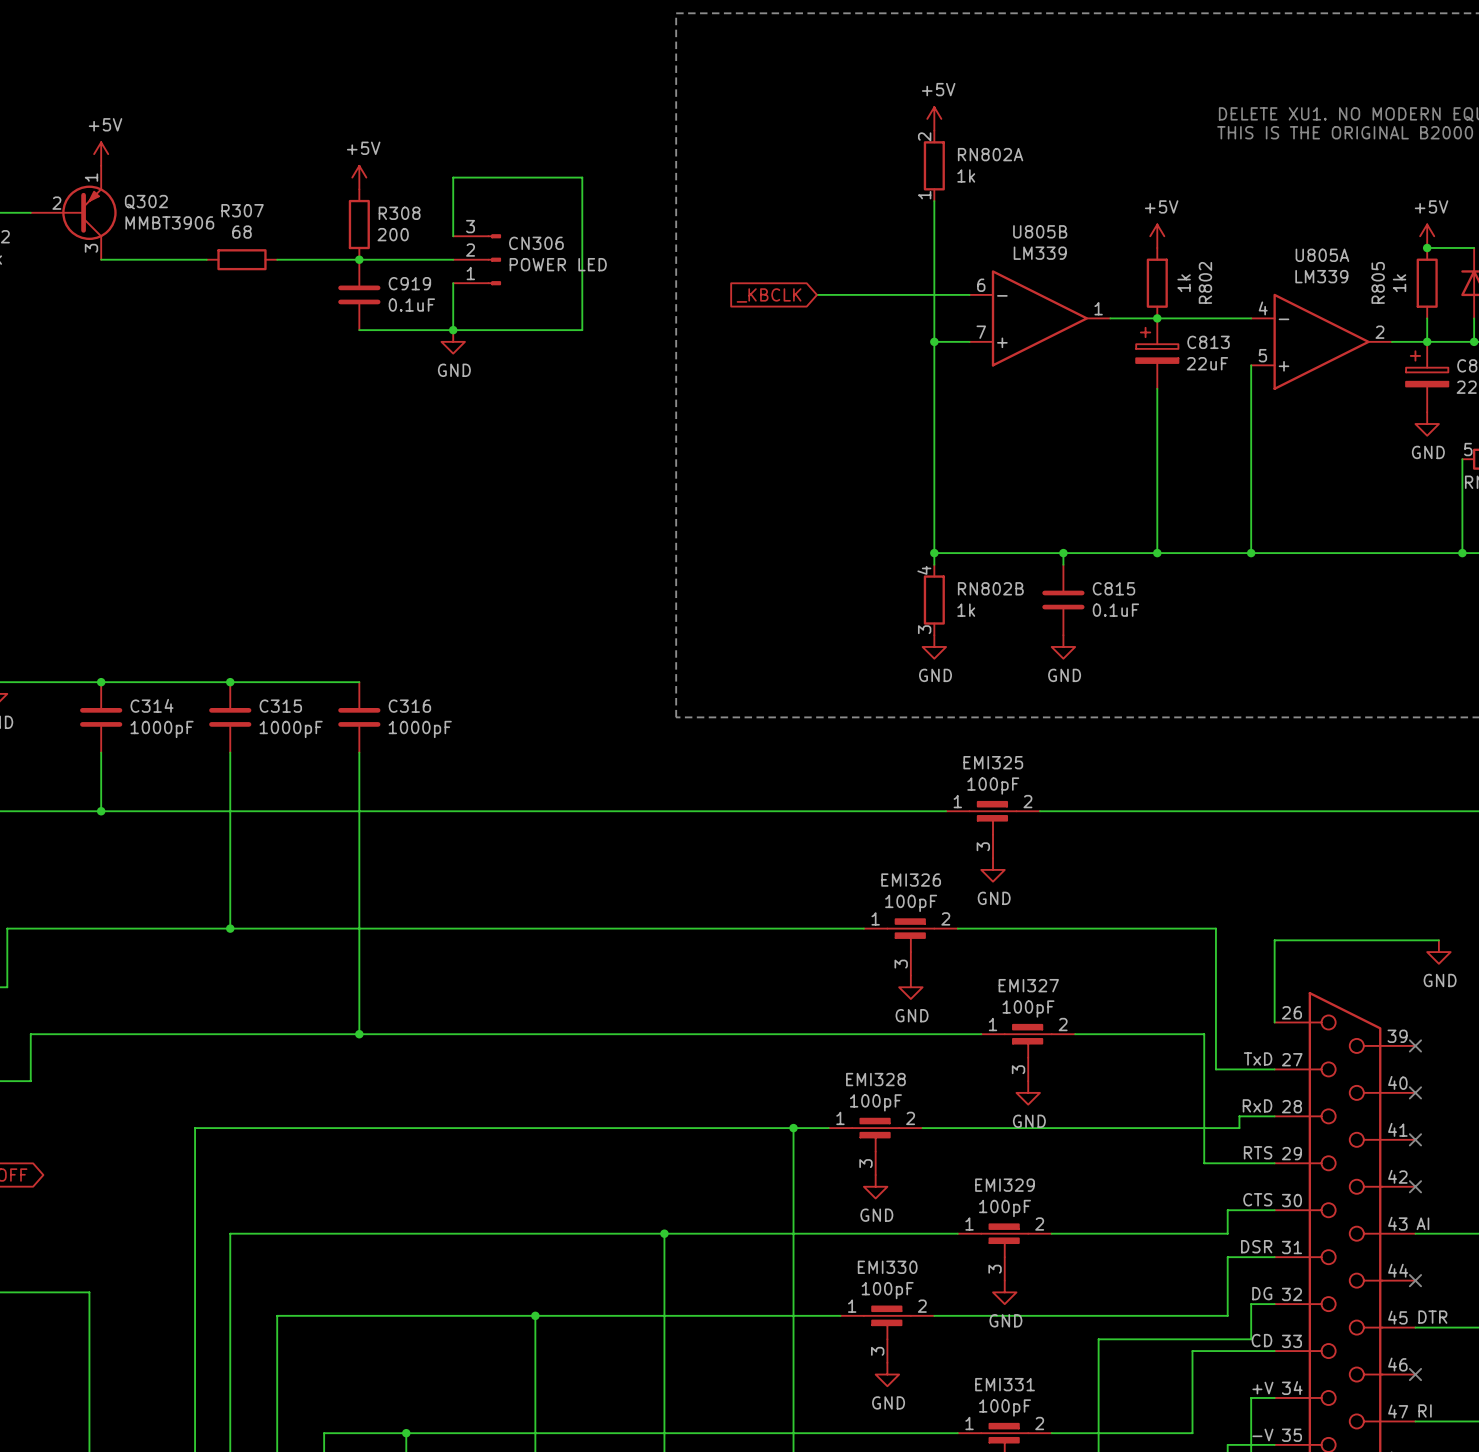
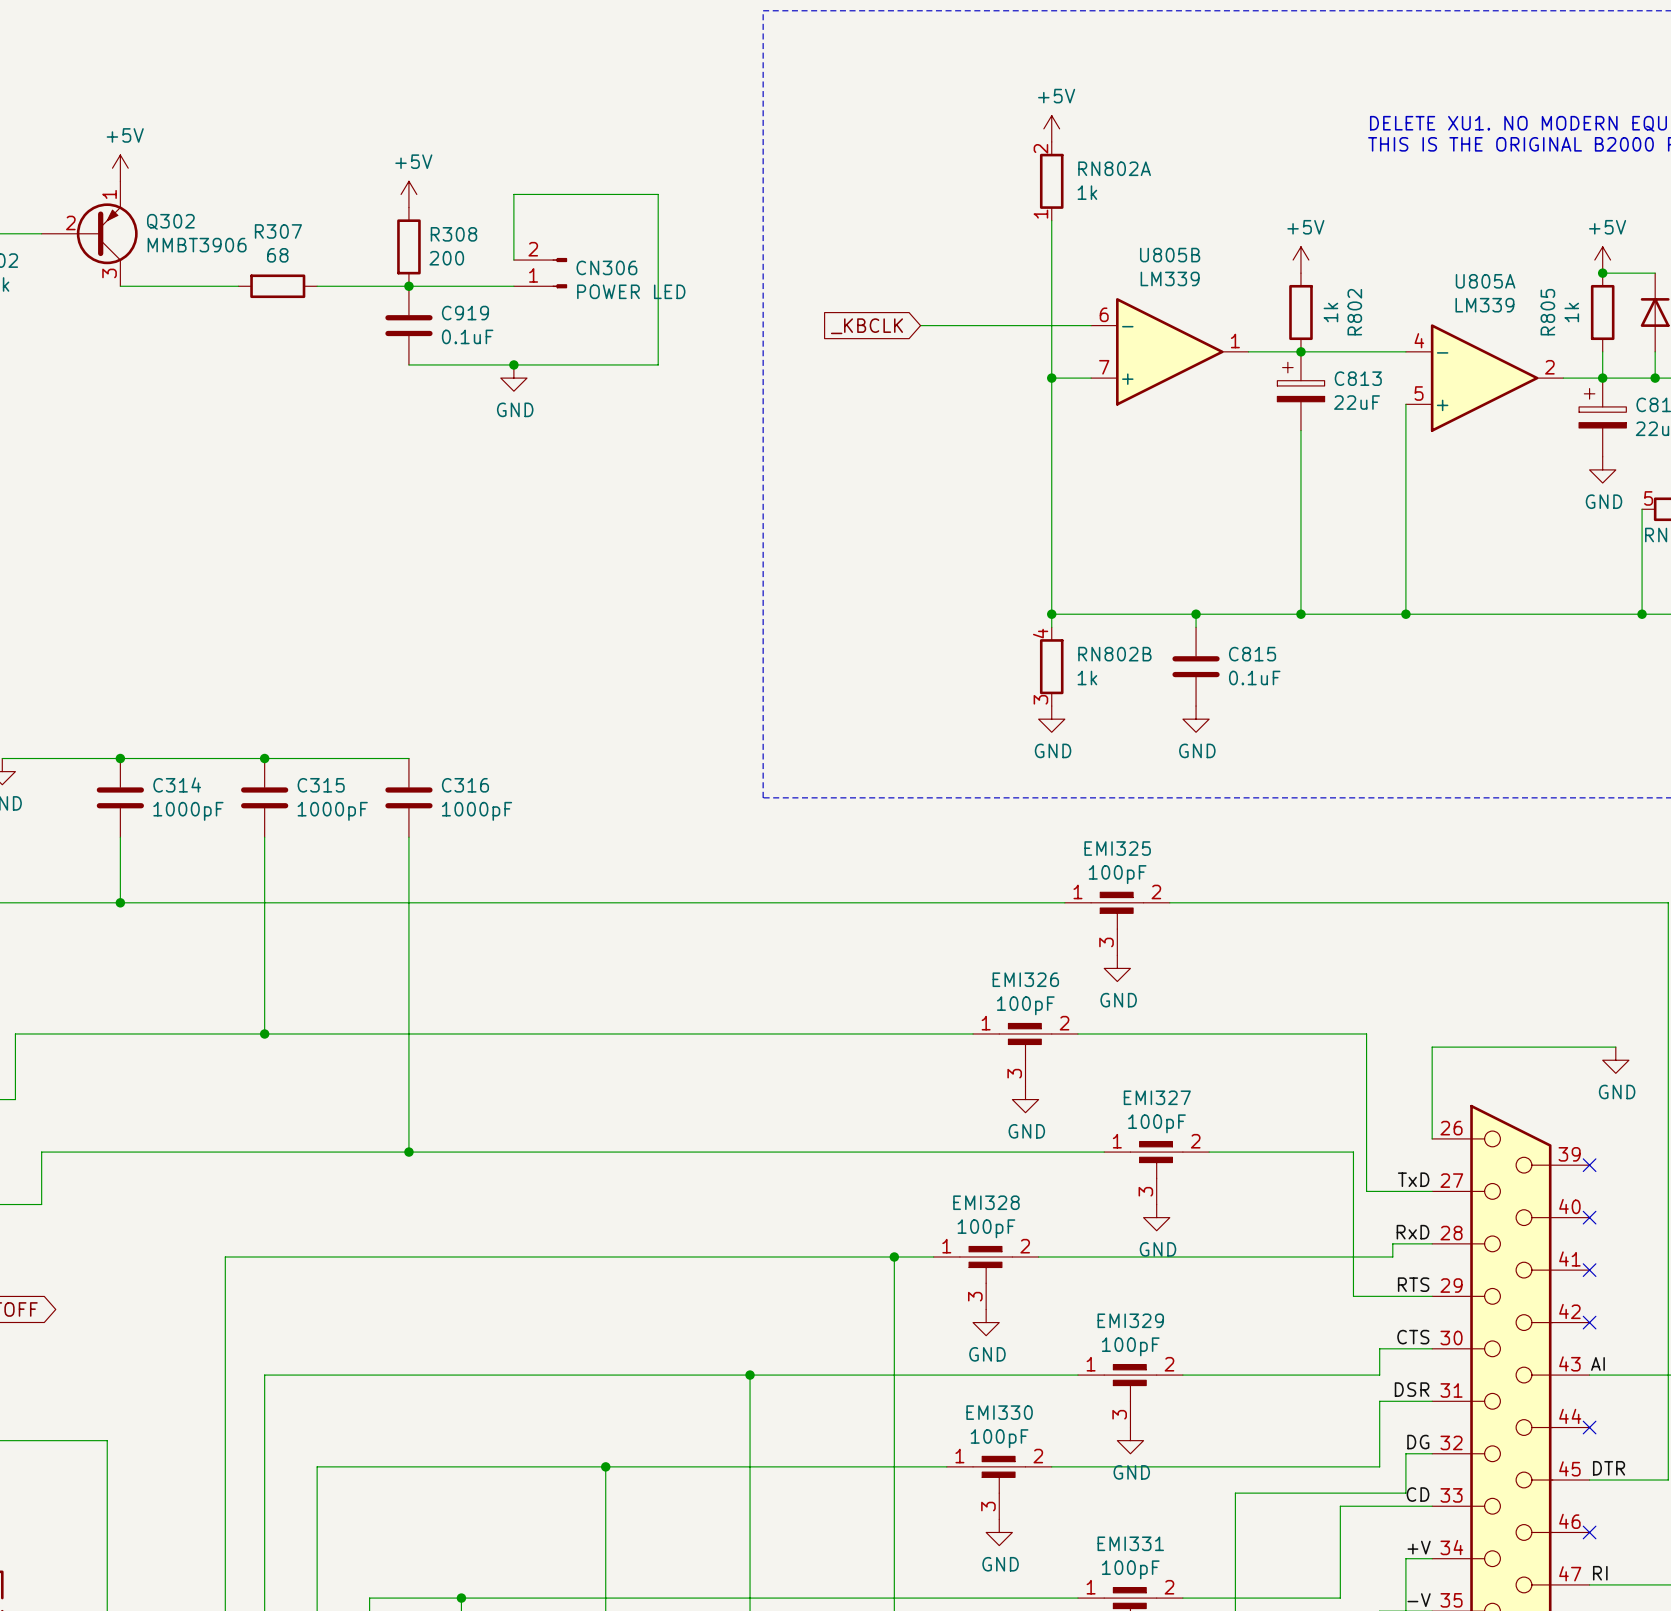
CN306 symbol: [453, 234, 501, 286] -> [513, 257, 568, 289]
wire: (453, 283) (453, 330) -> none

